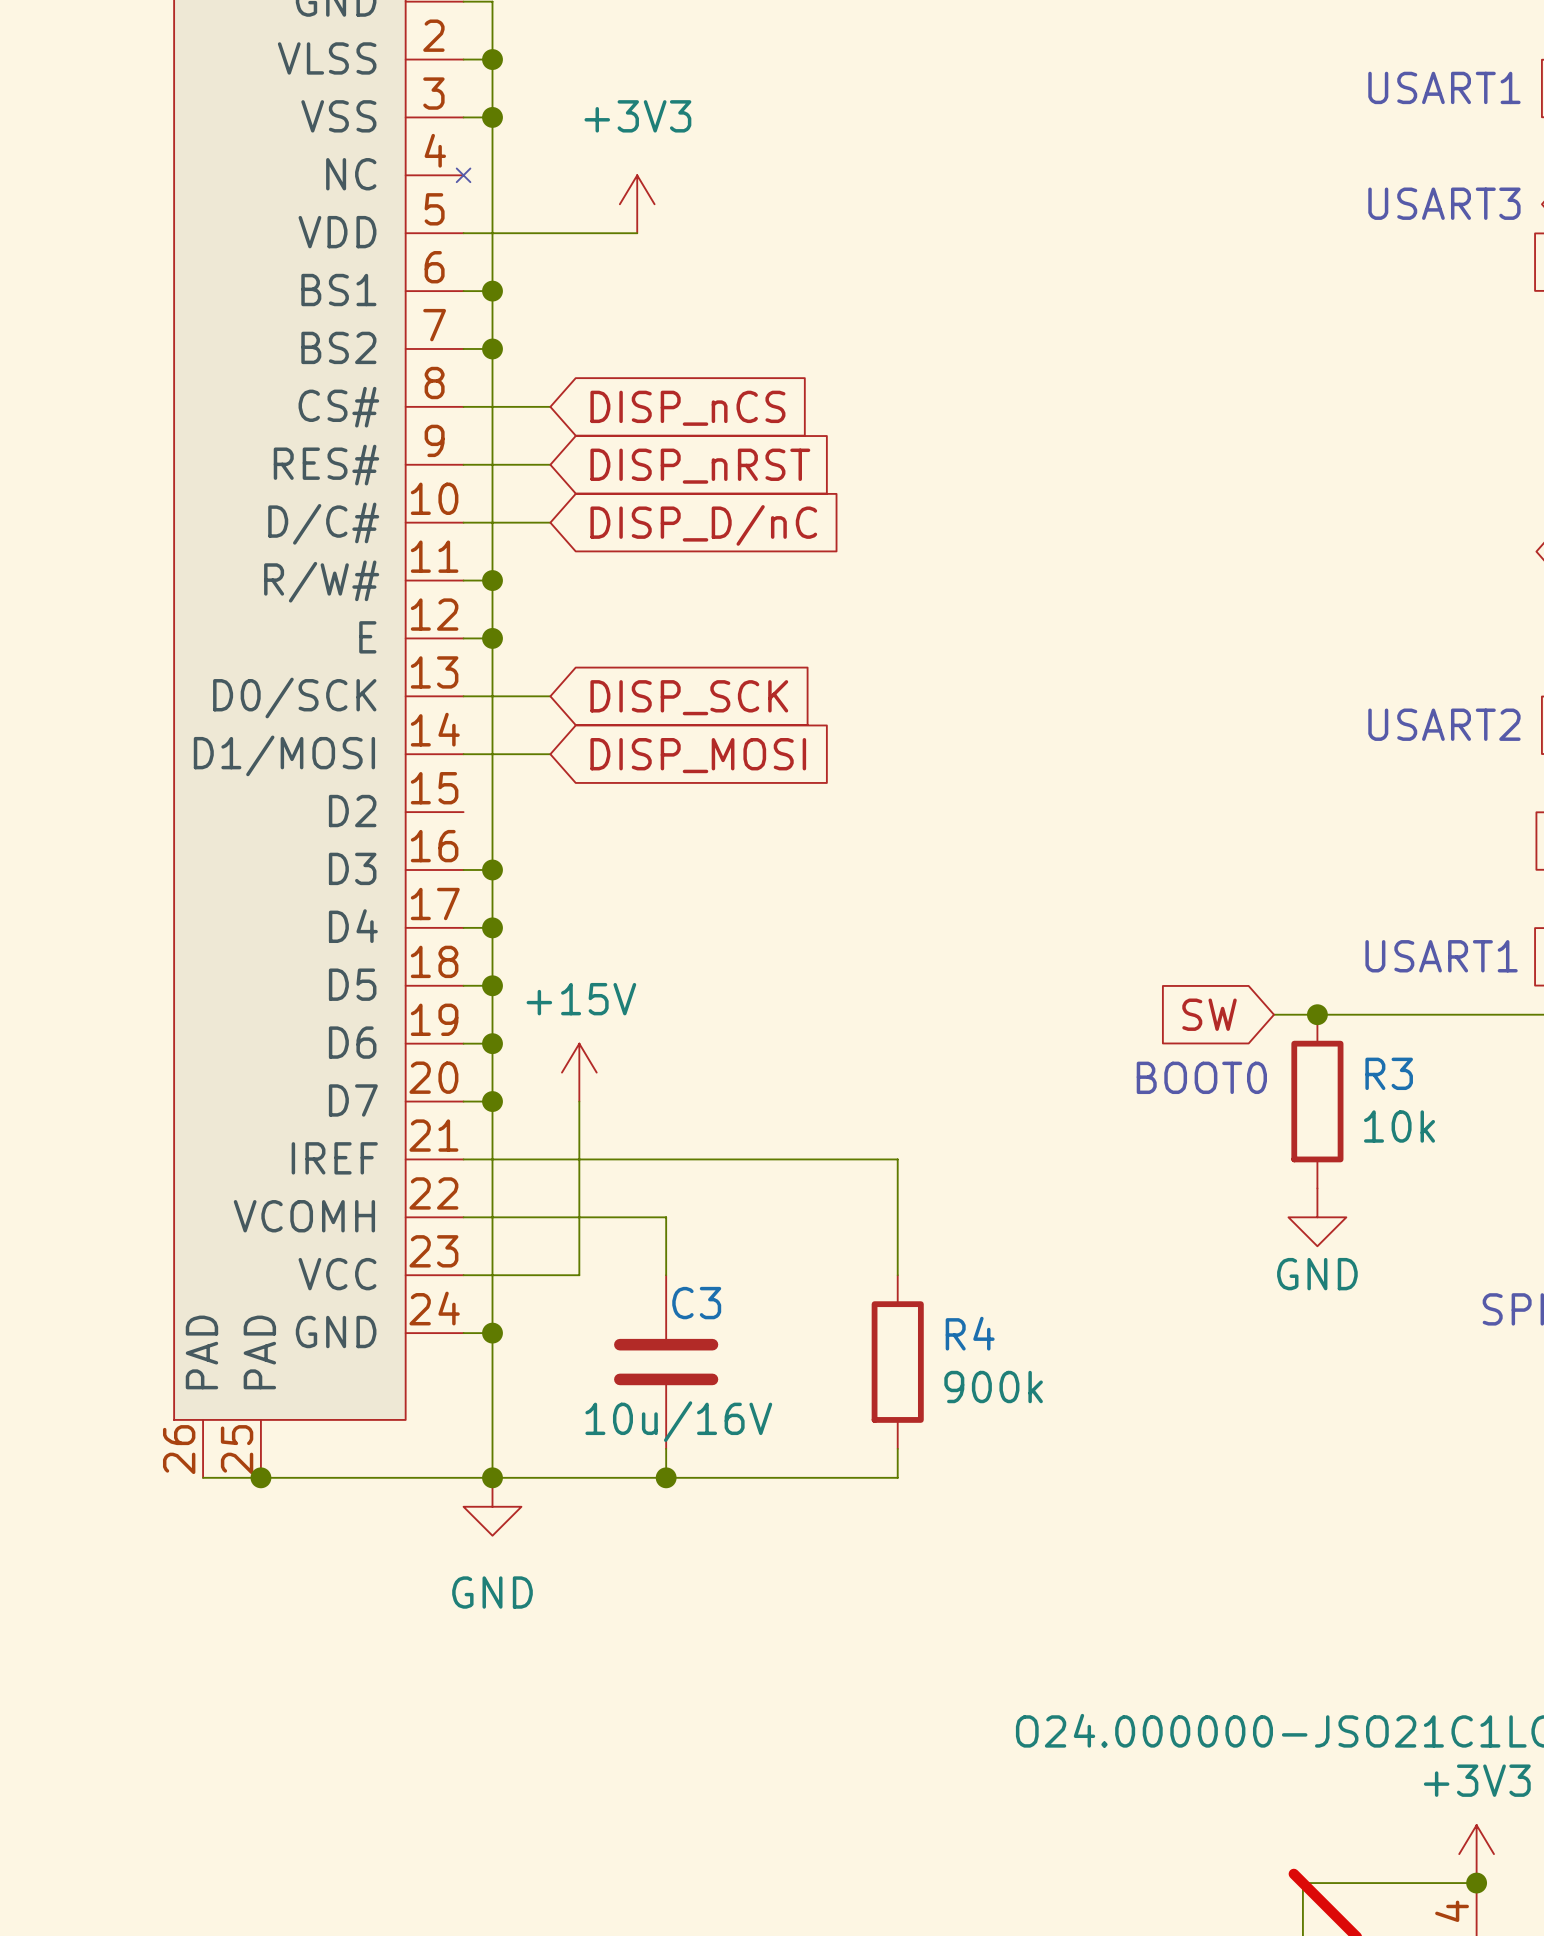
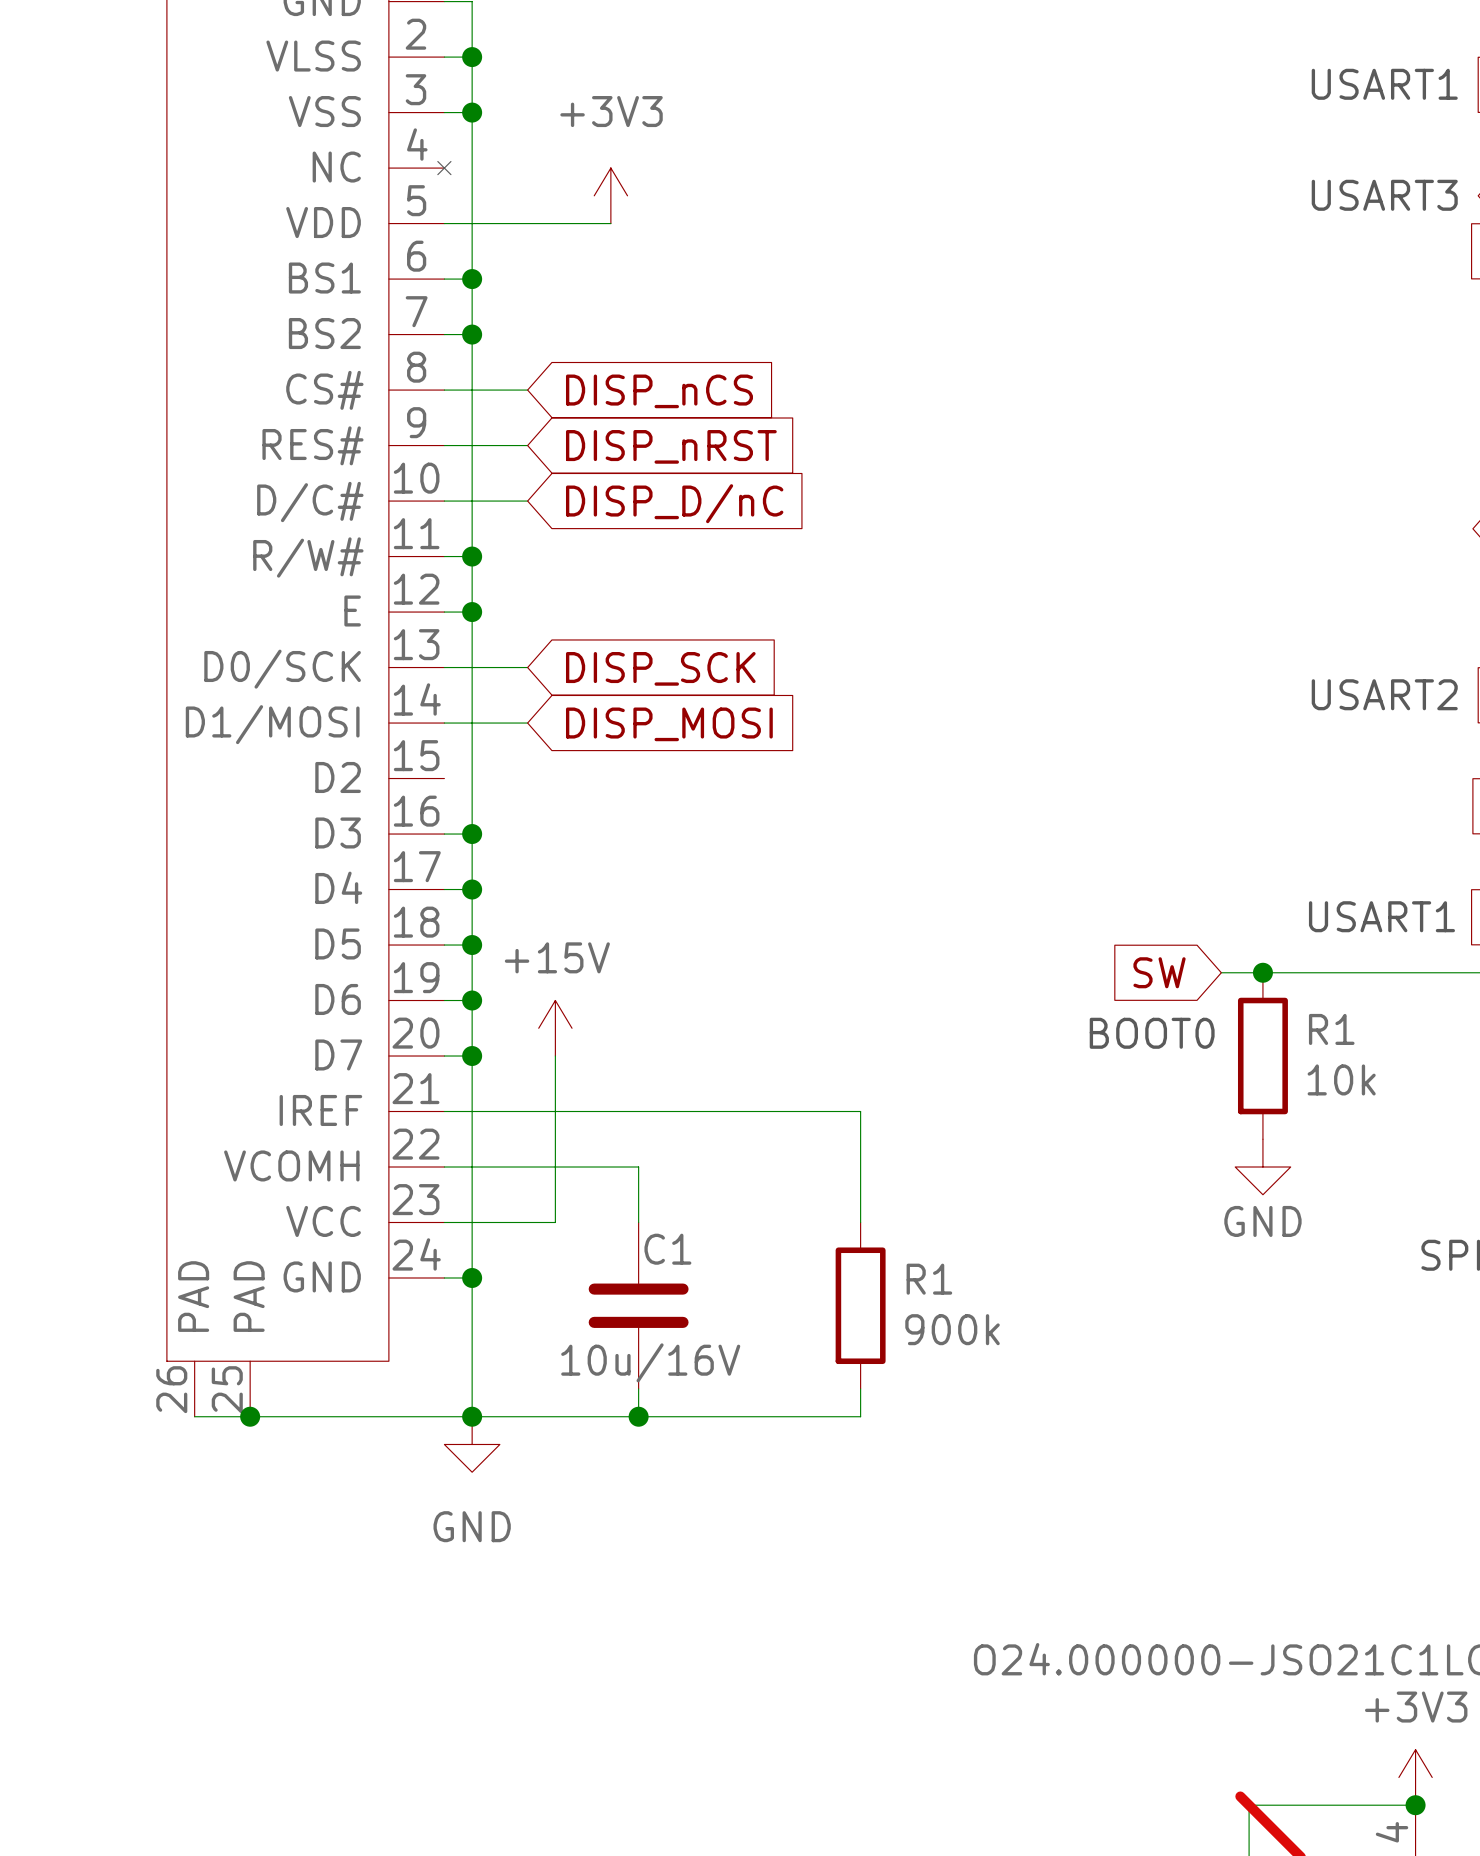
R3 name: R3 (1389, 1073) -> R1 (1331, 1029)
C3 name: C3 (696, 1303) -> C1 (667, 1249)
R4 name: R4 (970, 1333) -> R1 (929, 1279)

